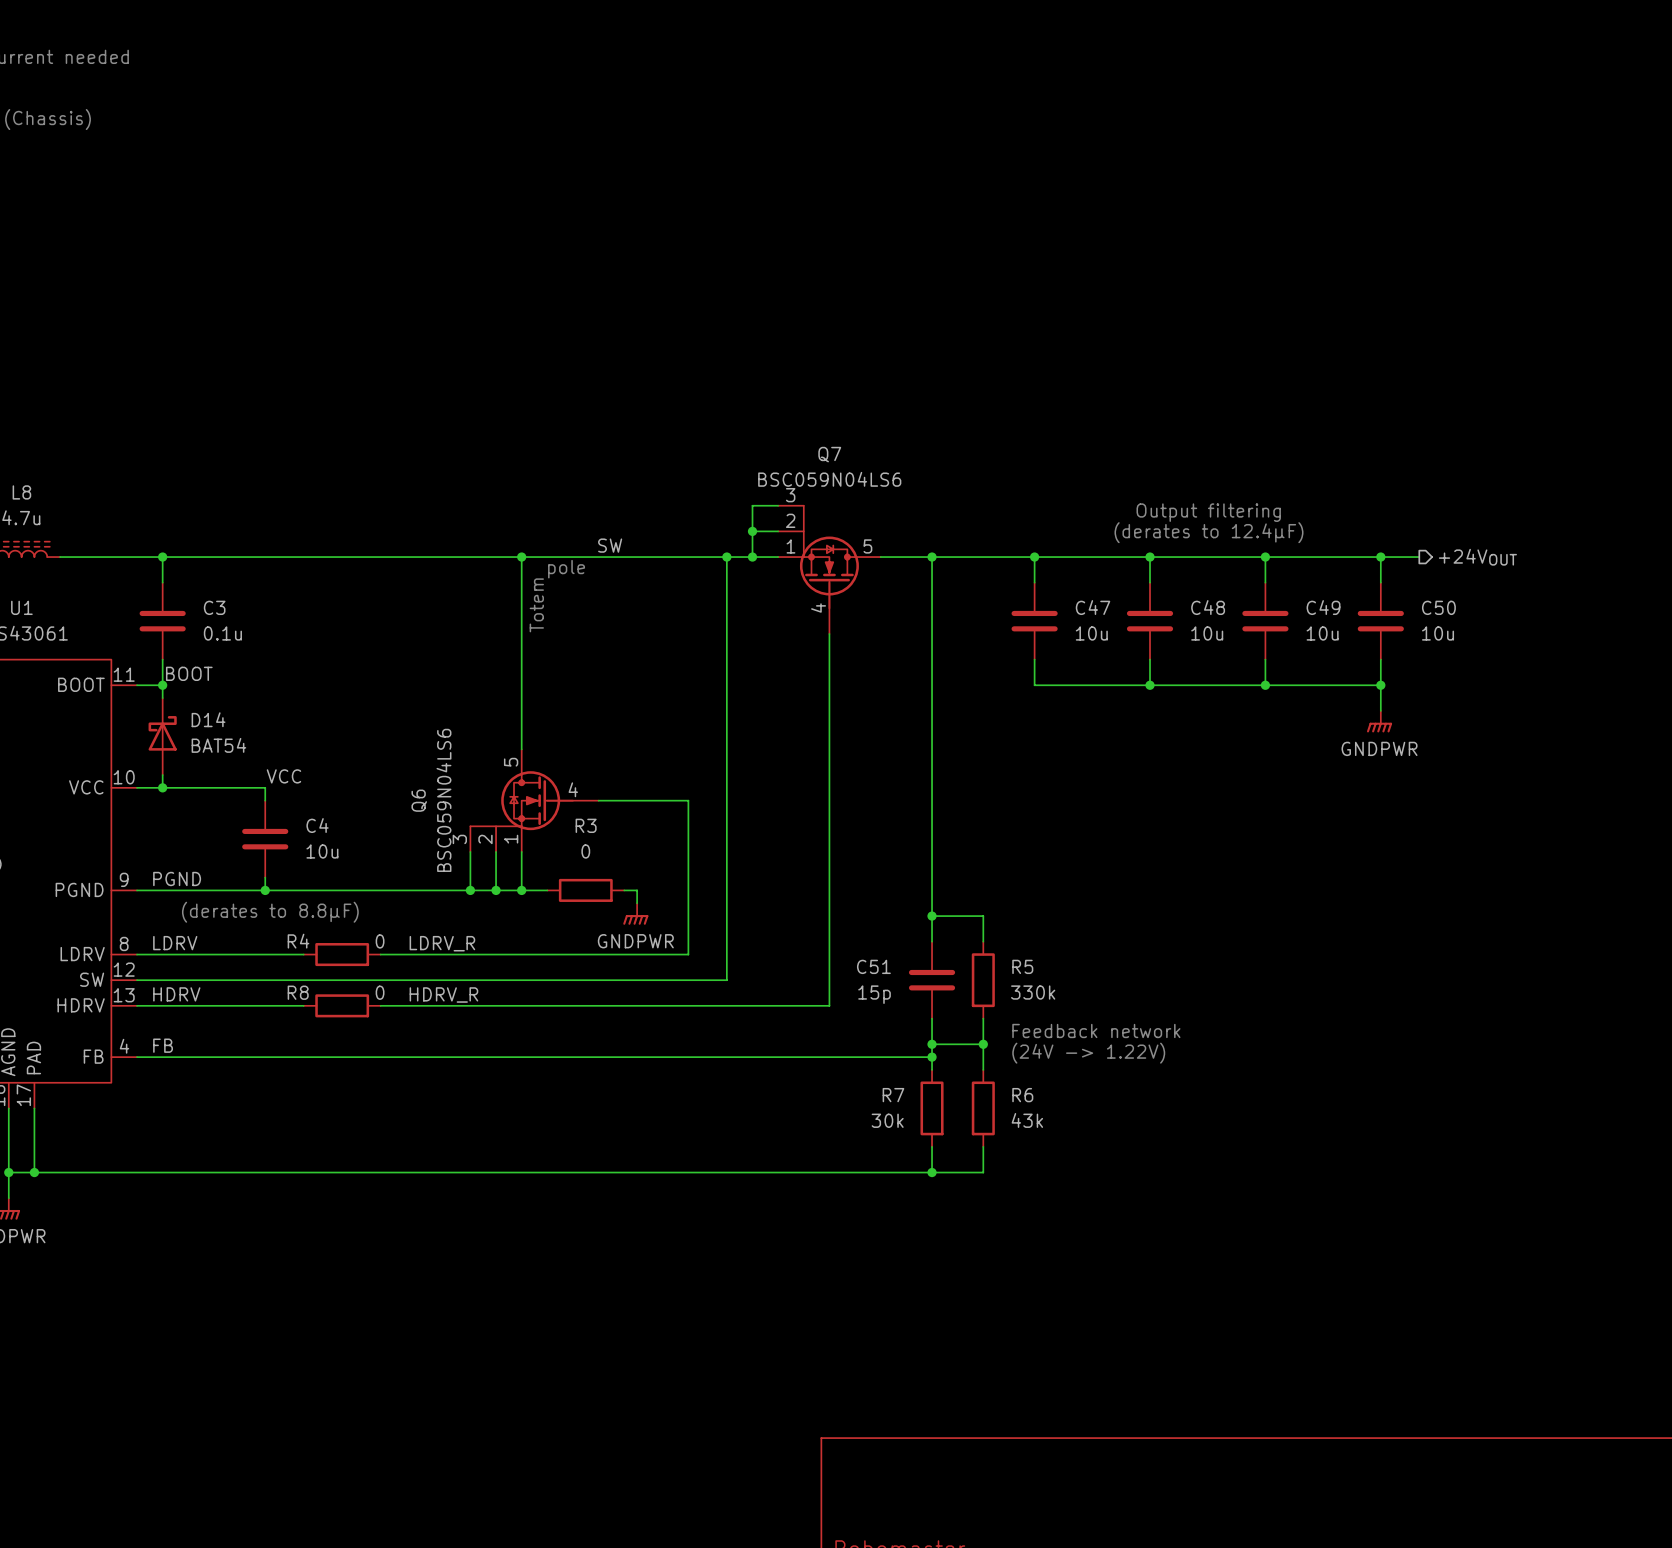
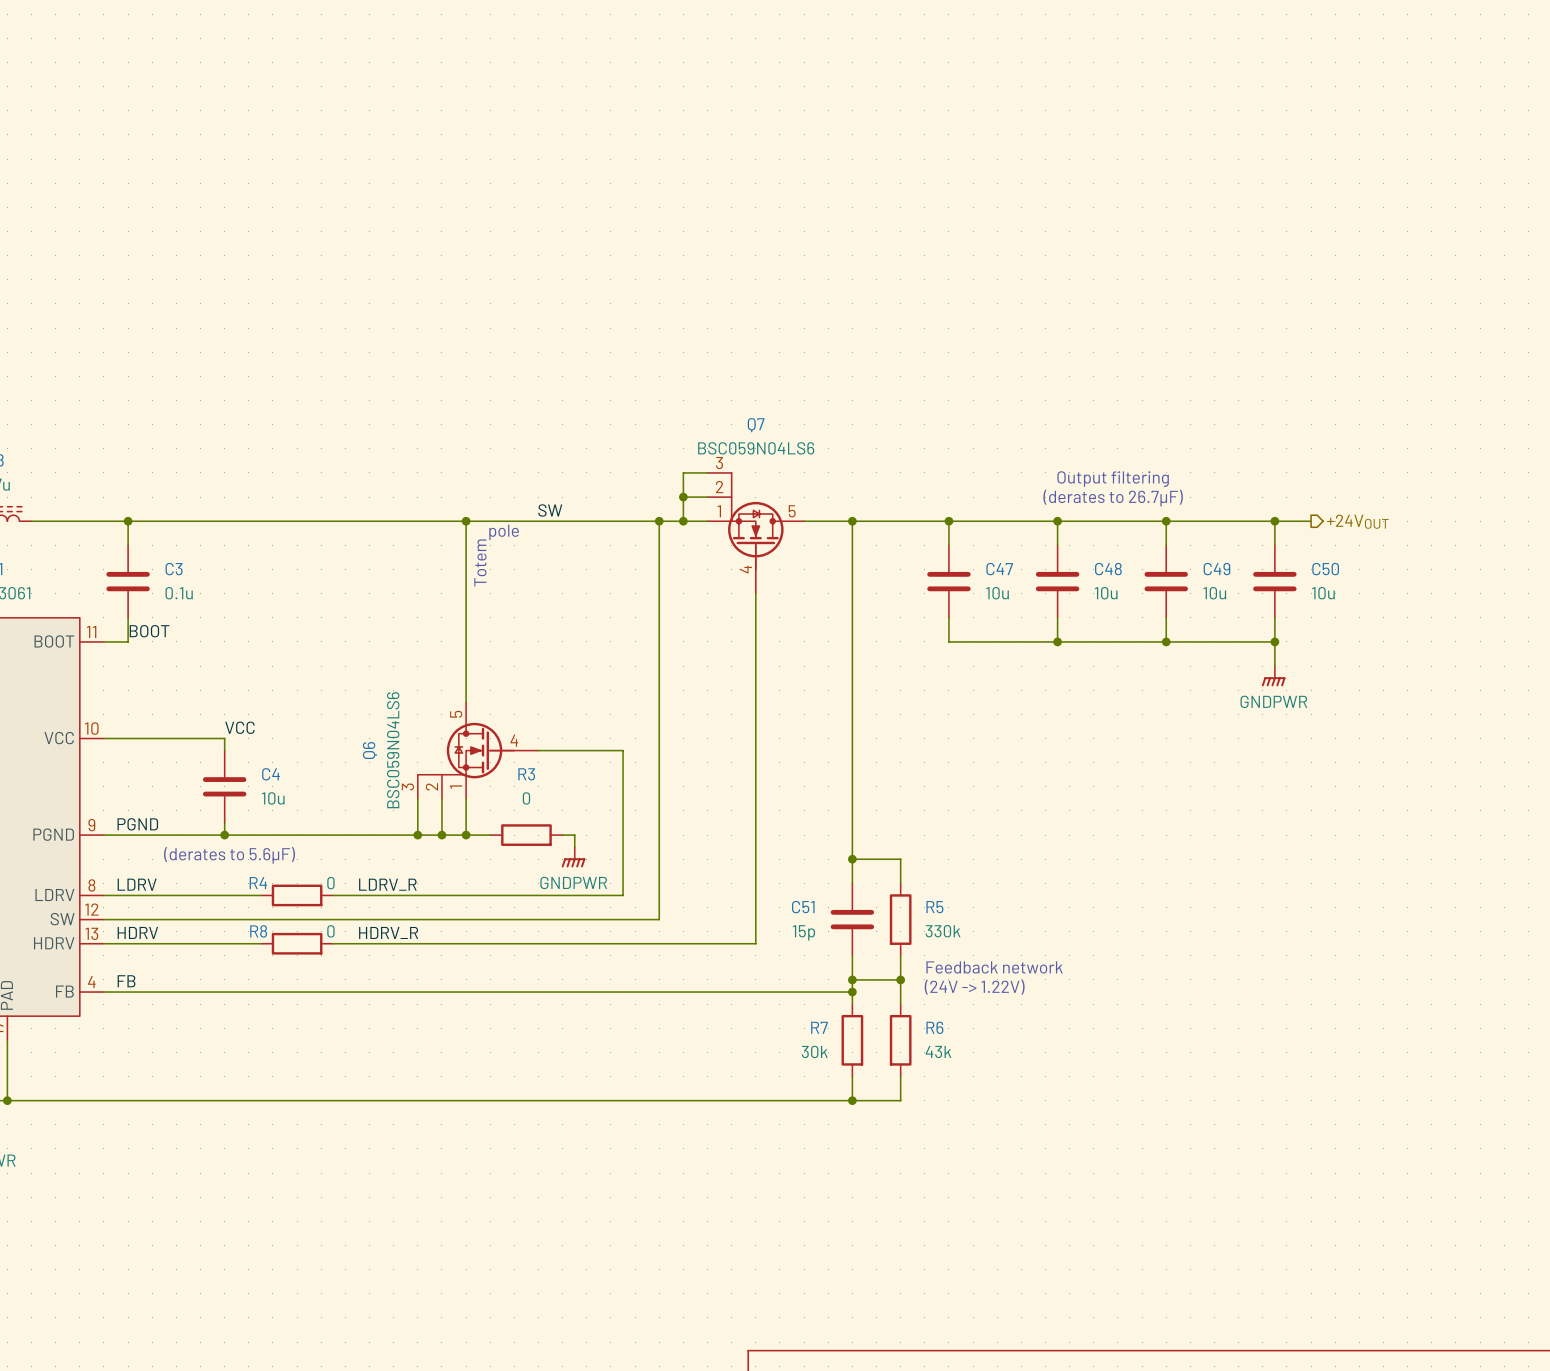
text: (derates to 12.4µF) (1208, 532) -> (derates to 26.7µF) (1113, 498)
wire: (162, 685) (162, 698) -> none
junction: (162, 685) -> none
D14: BAT54 (162, 736) -> none
wire: (162, 775) (162, 787) -> none
junction: (162, 787) -> none
text: (derates to 8.8µF) (270, 912) -> (derates to 5.6µF) (229, 855)

